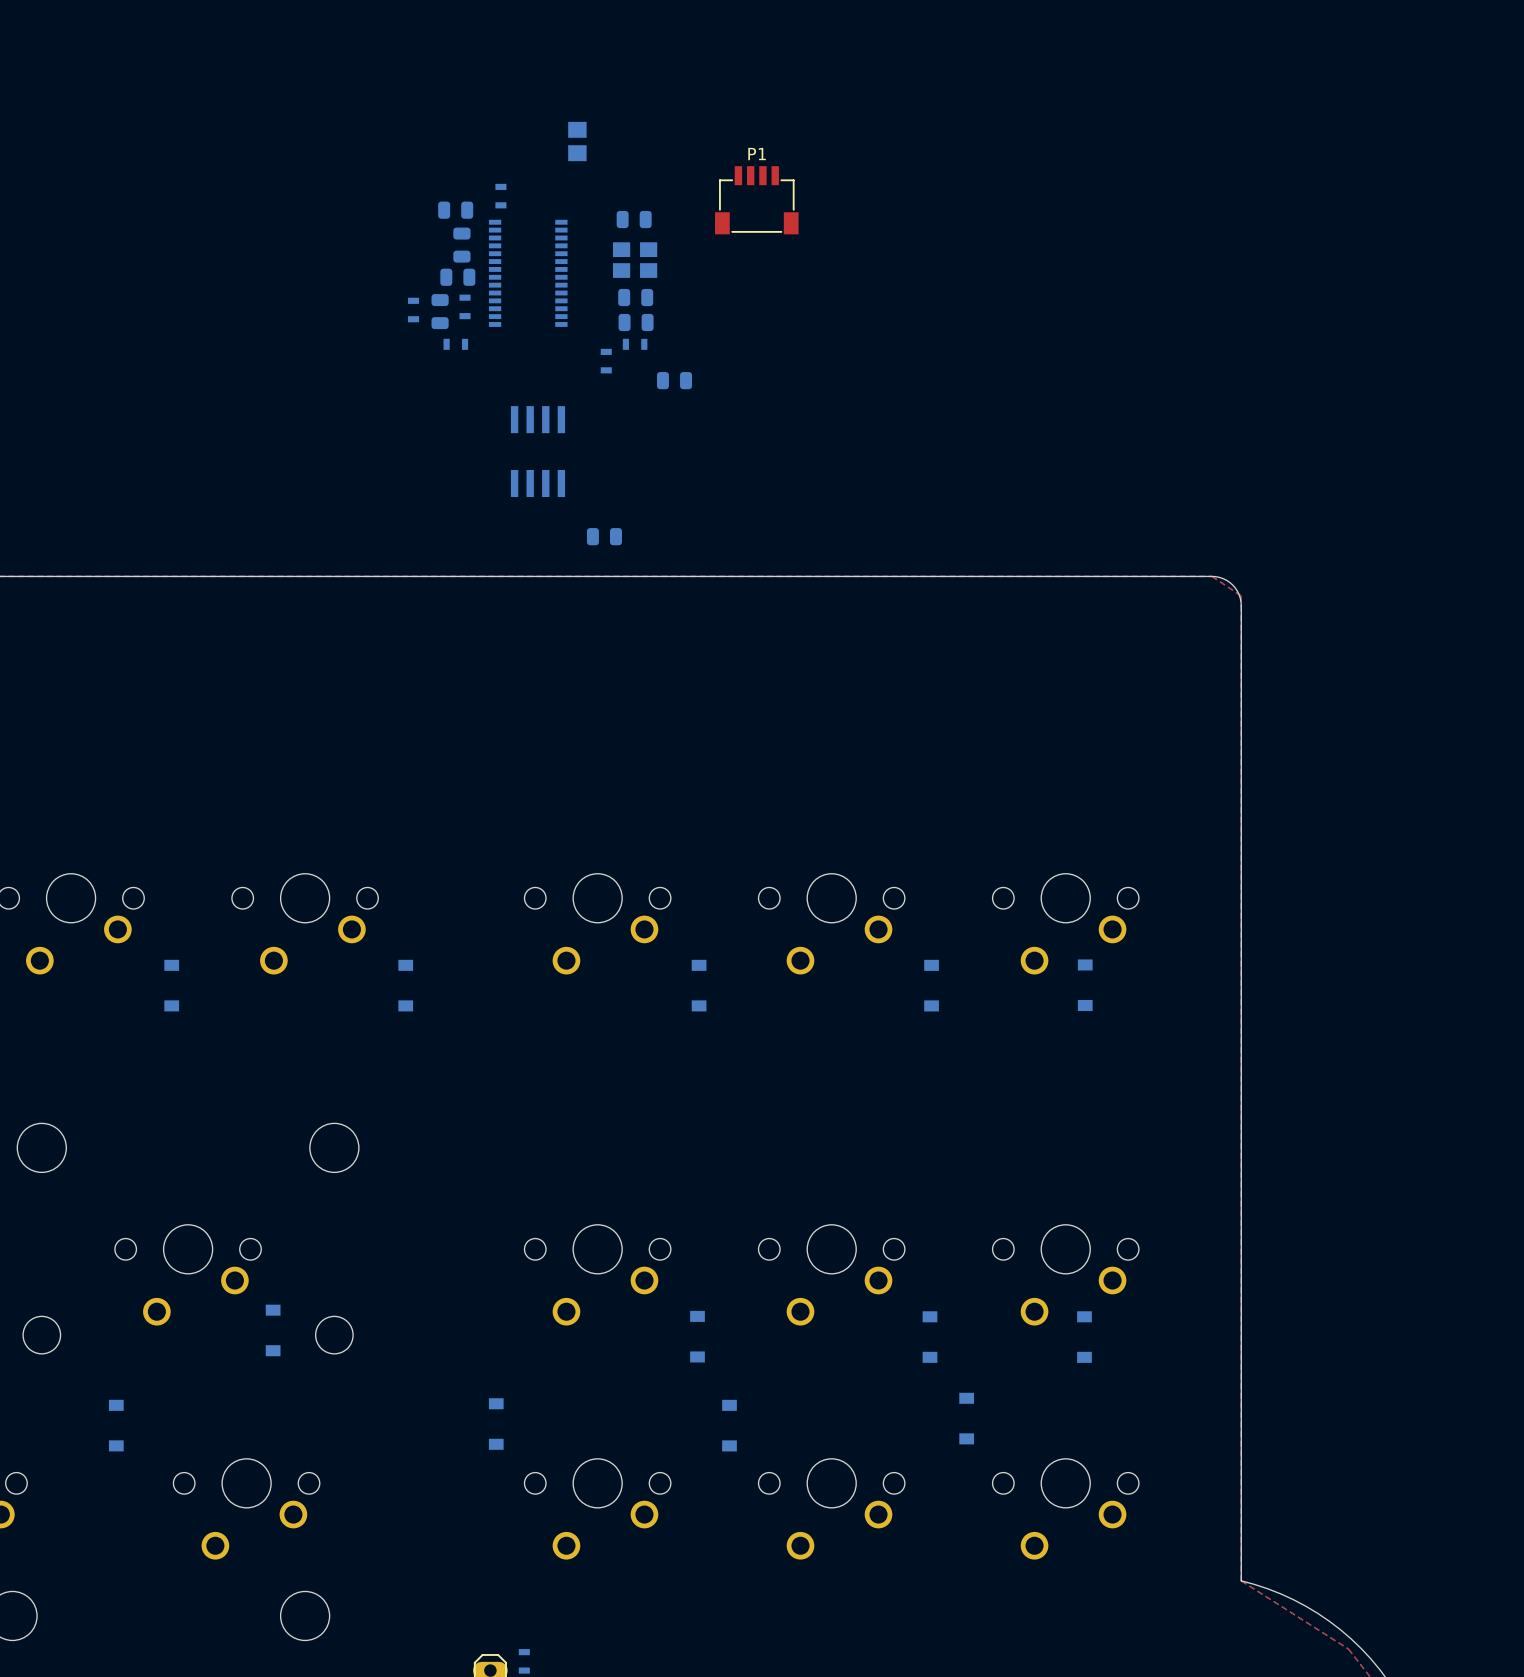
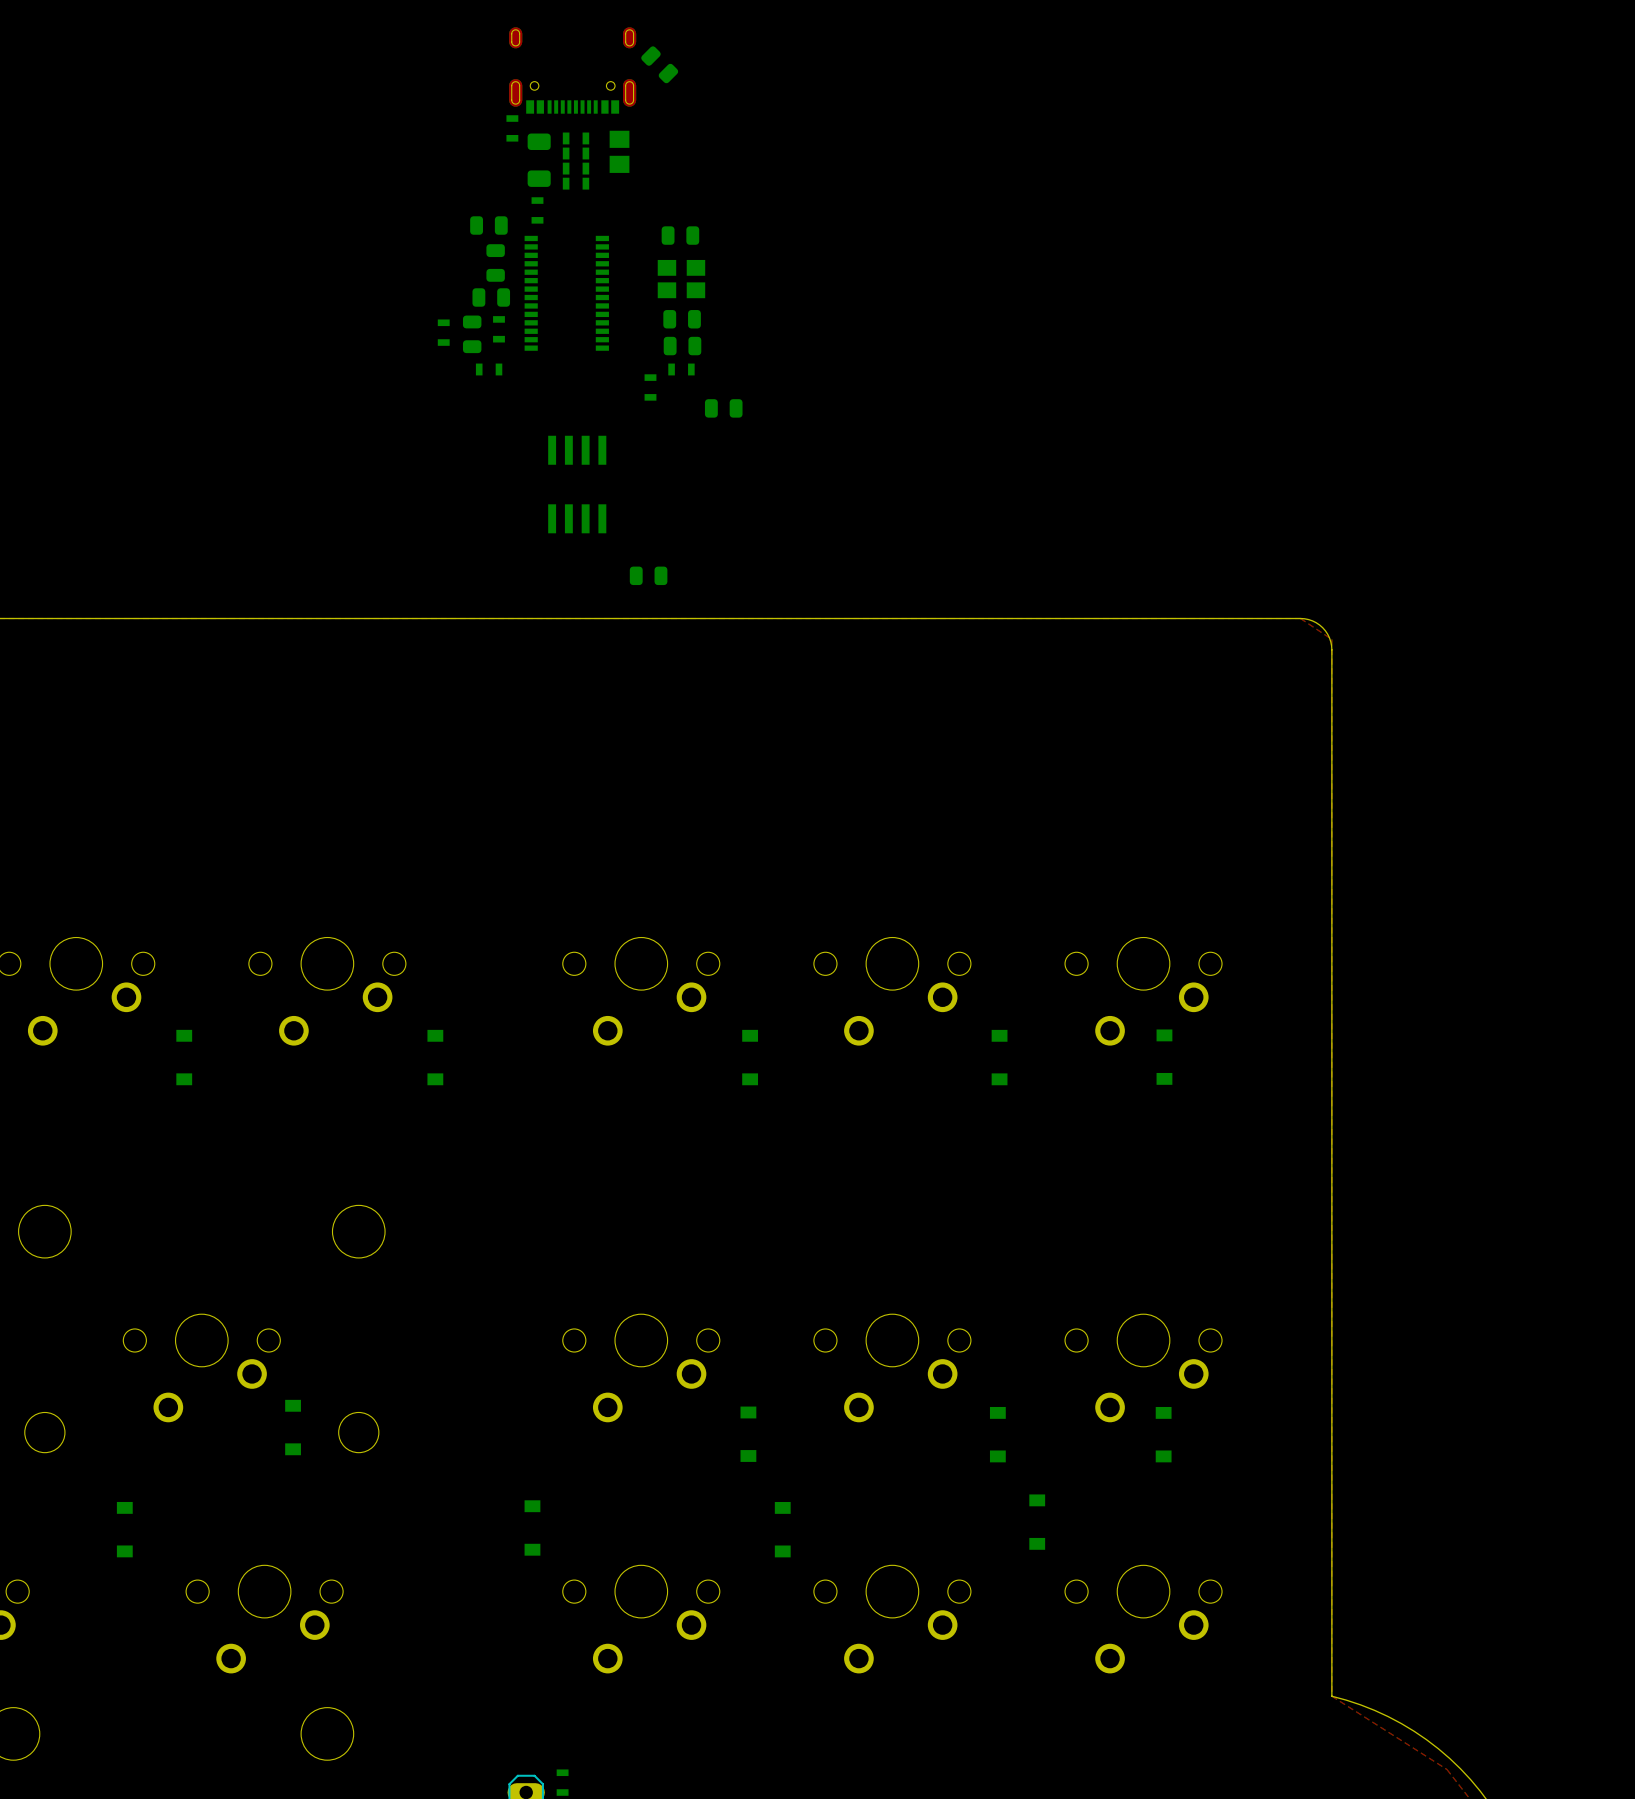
part: none -> (659, 64)
part: none -> (572, 70)
part: none -> (512, 128)
part: none -> (575, 138)
part: none -> (575, 153)
part: none -> (539, 160)
part: none -> (575, 168)
part: none -> (575, 183)
P1: (756, 200) -> none

